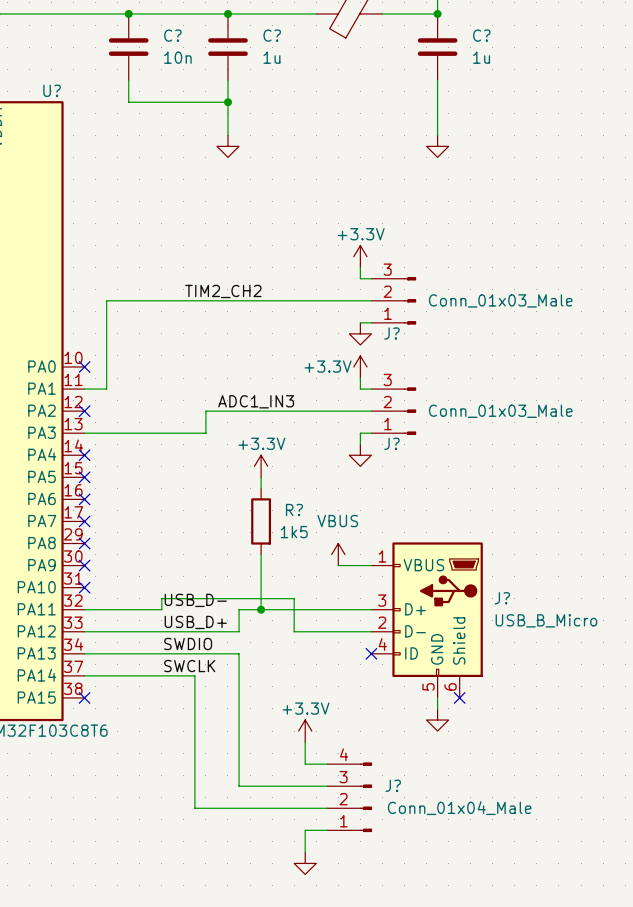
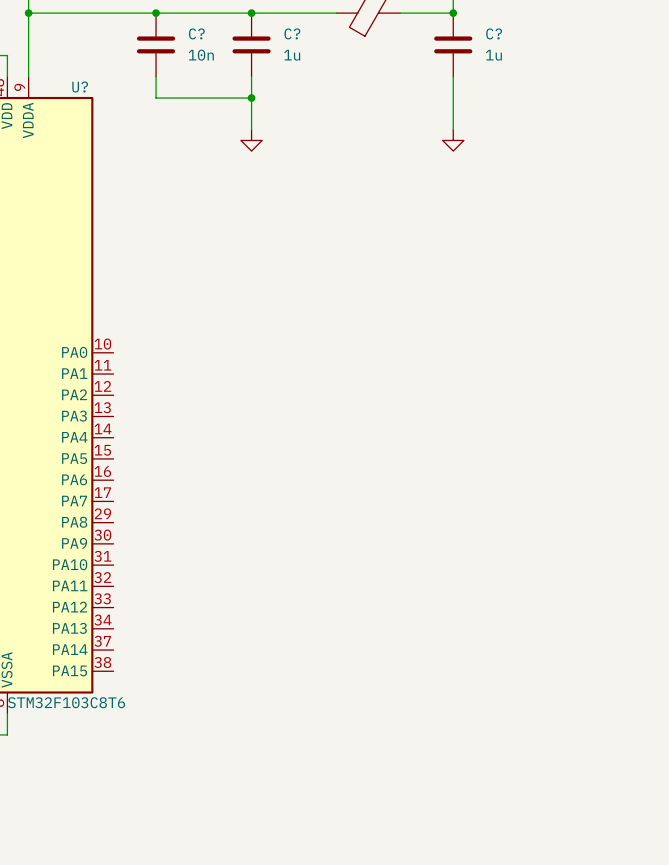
power symbol: +3.3V (360, 256) -> none
wire: (360, 267) (360, 278) (371, 278) -> none
label: TIM2_CH2 (223, 291) -> none
wire: (371, 300) (106, 300) (106, 389) (84, 389) -> none
J?: Conn_01x03_Male (393, 300) -> none
wire: (360, 322) (371, 322) -> none
power symbol: (360, 333) -> none
no-connect mark: (84, 367) -> none
power symbol: +3.3V (360, 367) -> none
wire: (360, 378) (360, 389) (371, 389) -> none
label: ADC1_IN3 (256, 401) -> none
no-connect mark: (84, 411) -> none
wire: (371, 411) (205, 411) (205, 433) (84, 433) -> none
J?: Conn_01x03_Male (393, 411) -> none
wire: (371, 433) (360, 433) (360, 444) -> none
no-connect mark: (84, 455) -> none
power symbol: (360, 455) -> none
power symbol: +3.3V (261, 466) -> none
no-connect mark: (84, 477) -> none
wire: (261, 477) (261, 488) -> none
no-connect mark: (84, 499) -> none
no-connect mark: (84, 521) -> none
R?: 1k5 (261, 521) -> none
no-connect mark: (84, 543) -> none
wire: (261, 554) (261, 609) -> none
power symbol: VBUS (338, 554) -> none
no-connect mark: (84, 565) -> none
wire: (338, 565) (371, 565) -> none
no-connect mark: (84, 587) -> none
label: USB_D- (195, 600) -> none
wire: (84, 609) (161, 609) (161, 598) (294, 598) (294, 631) (371, 631) -> none
junction: (261, 609) -> none
wire: (371, 609) (239, 609) (239, 631) (84, 631) -> none
J?: USB_B_Micro (427, 620) -> none
label: USB_D+ (195, 622) -> none
label: SWDIO (188, 643) -> none
wire: (84, 653) (239, 653) (239, 786) (327, 786) -> none
no-connect mark: (371, 653) -> none
label: SWCLK (189, 666) -> none
wire: (84, 675) (194, 675) (194, 808) (327, 808) -> none
no-connect mark: (84, 697) -> none
wire: (437, 697) (437, 708) -> none
no-connect mark: (459, 697) -> none
power symbol: (437, 720) -> none
power symbol: +3.3V (305, 731) -> none
wire: (305, 742) (305, 764) (327, 764) -> none
J?: Conn_01x04_Male (349, 797) -> none
wire: (327, 830) (305, 830) (305, 852) -> none
power symbol: (305, 863) -> none

